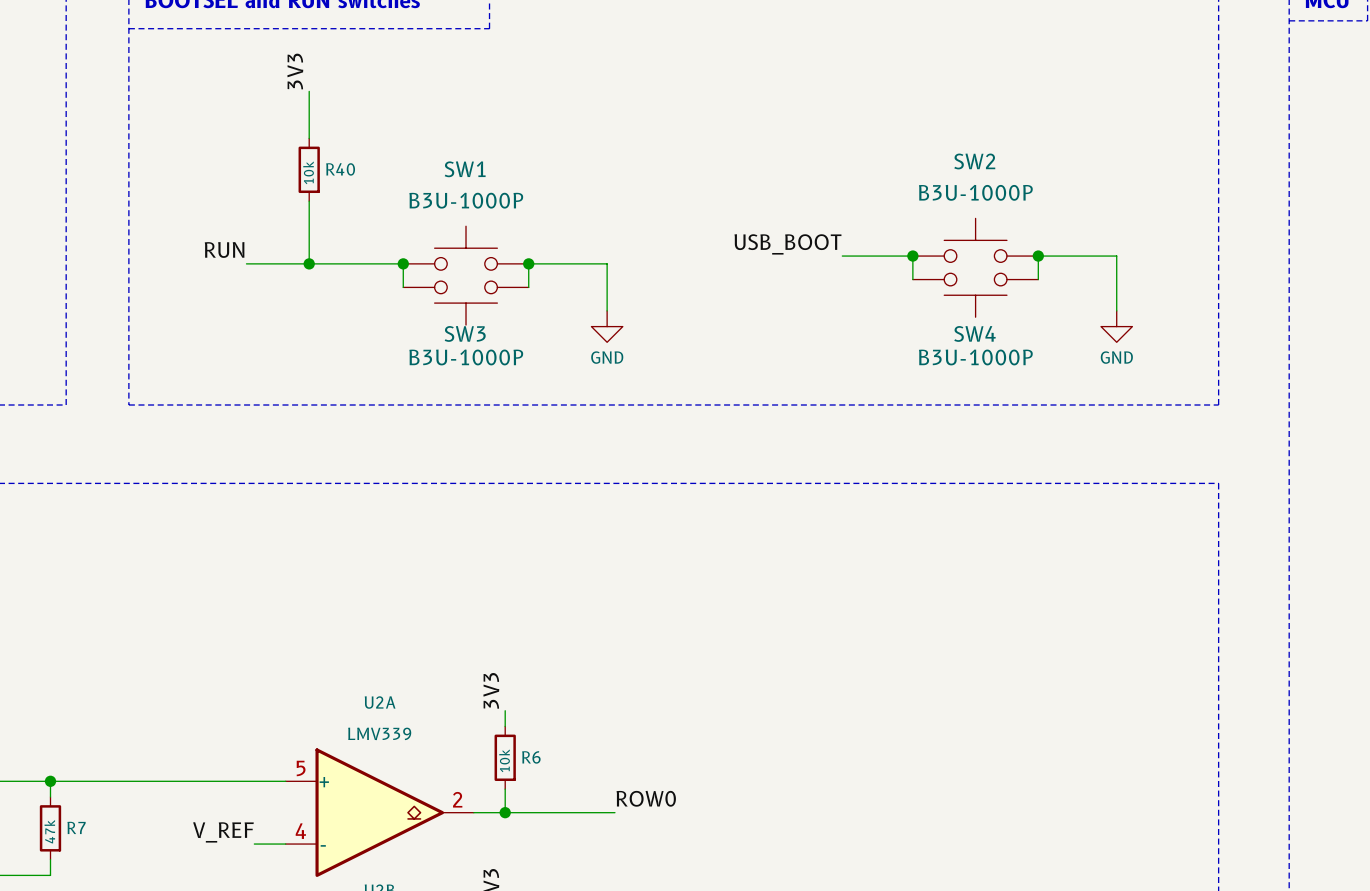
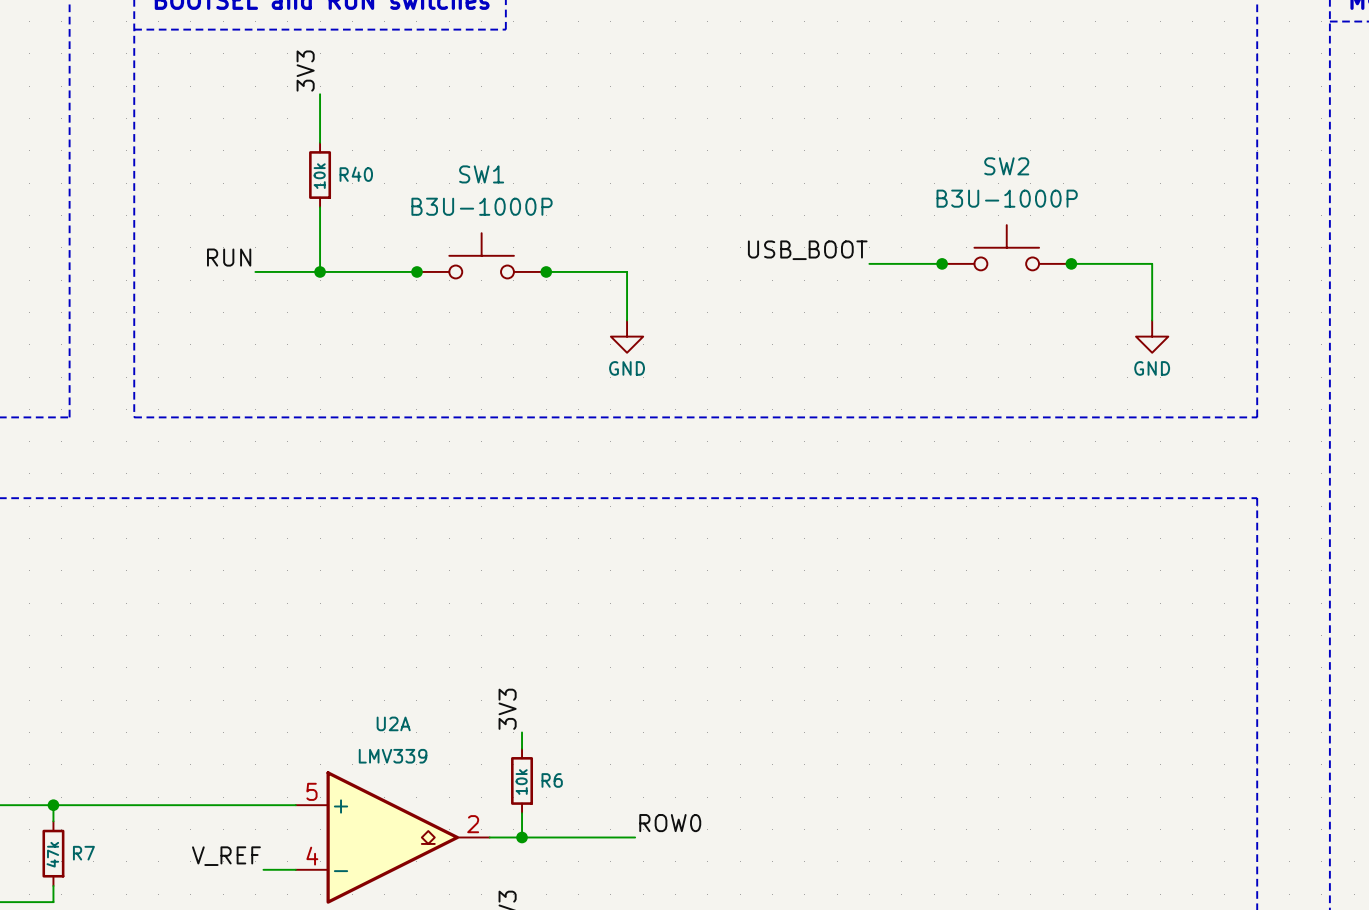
wire: (912, 256) (912, 279) -> none
wire: (1038, 256) (1038, 279) -> none
wire: (403, 263) (403, 287) -> none
wire: (528, 263) (528, 287) -> none
SW4: B3U-1000P (975, 295) -> none
SW3: B3U-1000P (466, 303) -> none

